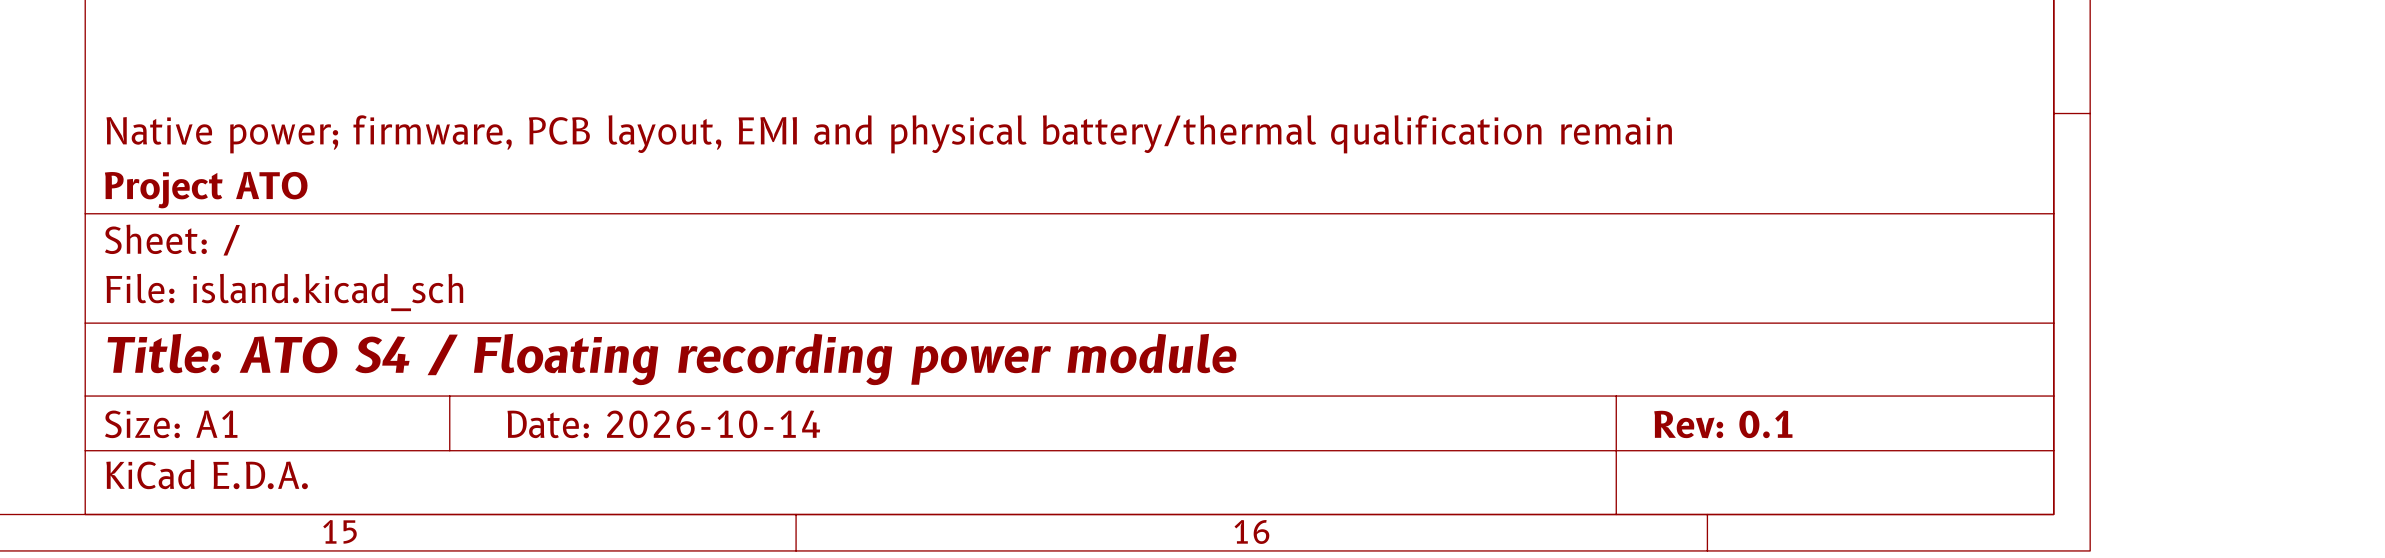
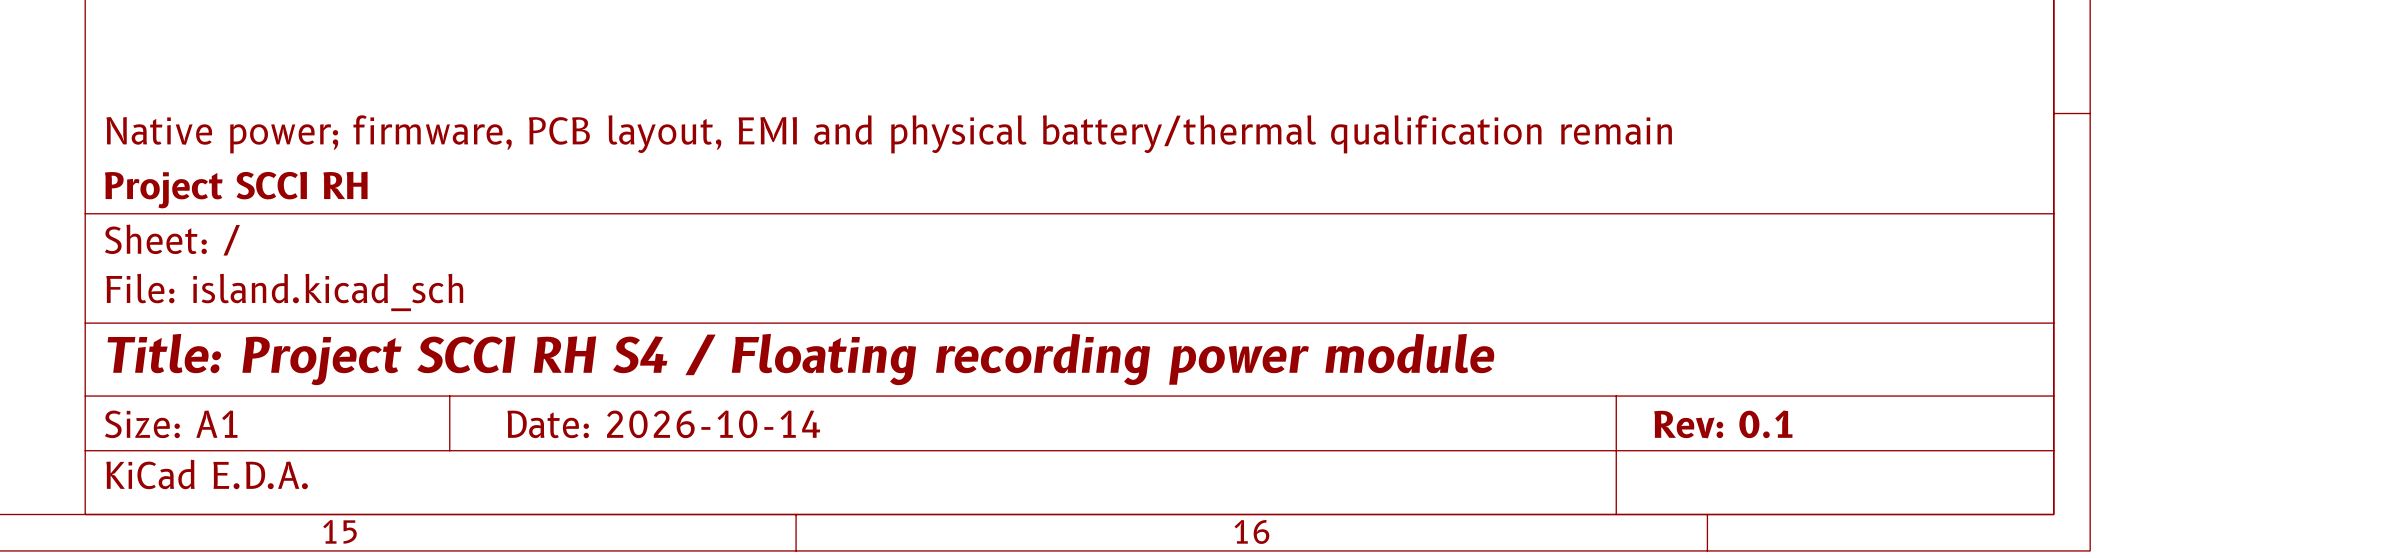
title block: Project ATO (206, 190) -> Project SCCI RH (236, 190)
title block: Title: ATO S4 / Floating recording power module (672, 359) -> Title: Project SCCI RH S4 / Floating recording power module (801, 359)

